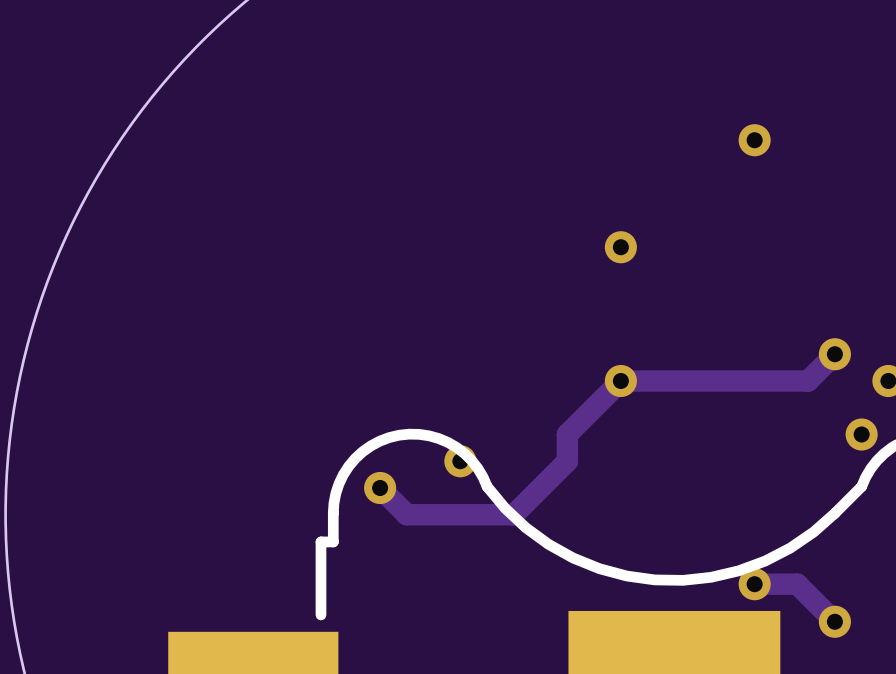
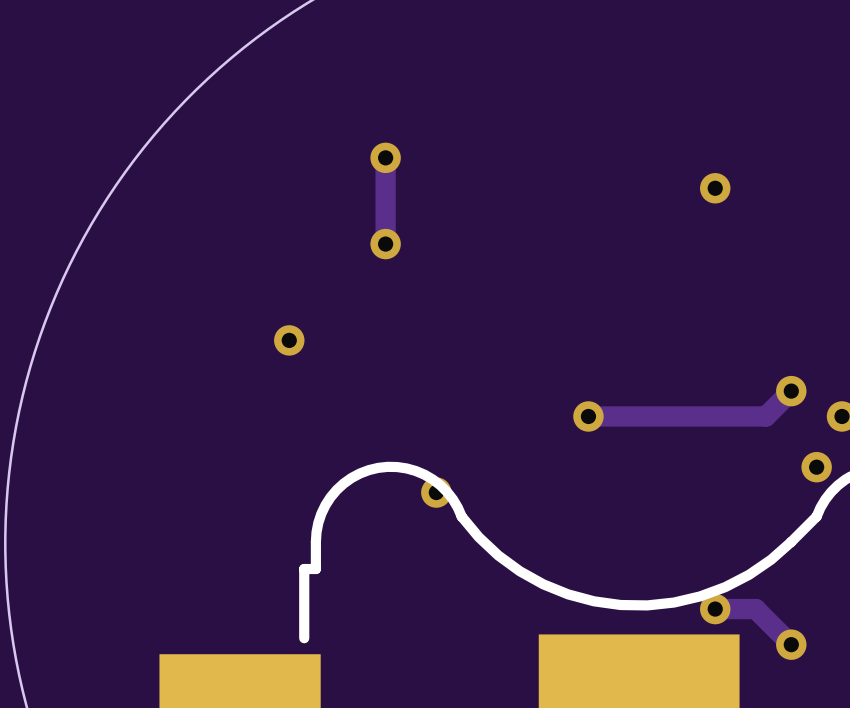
track: none -> (385, 157) (385, 244)
via: none -> (385, 157)
via: none -> (385, 244)
via: (620, 247) -> none
via: none -> (289, 340)
track: (620, 381) (567, 434) (567, 461) (513, 514) (406, 514) (380, 488) -> none
via: (380, 488) -> none

